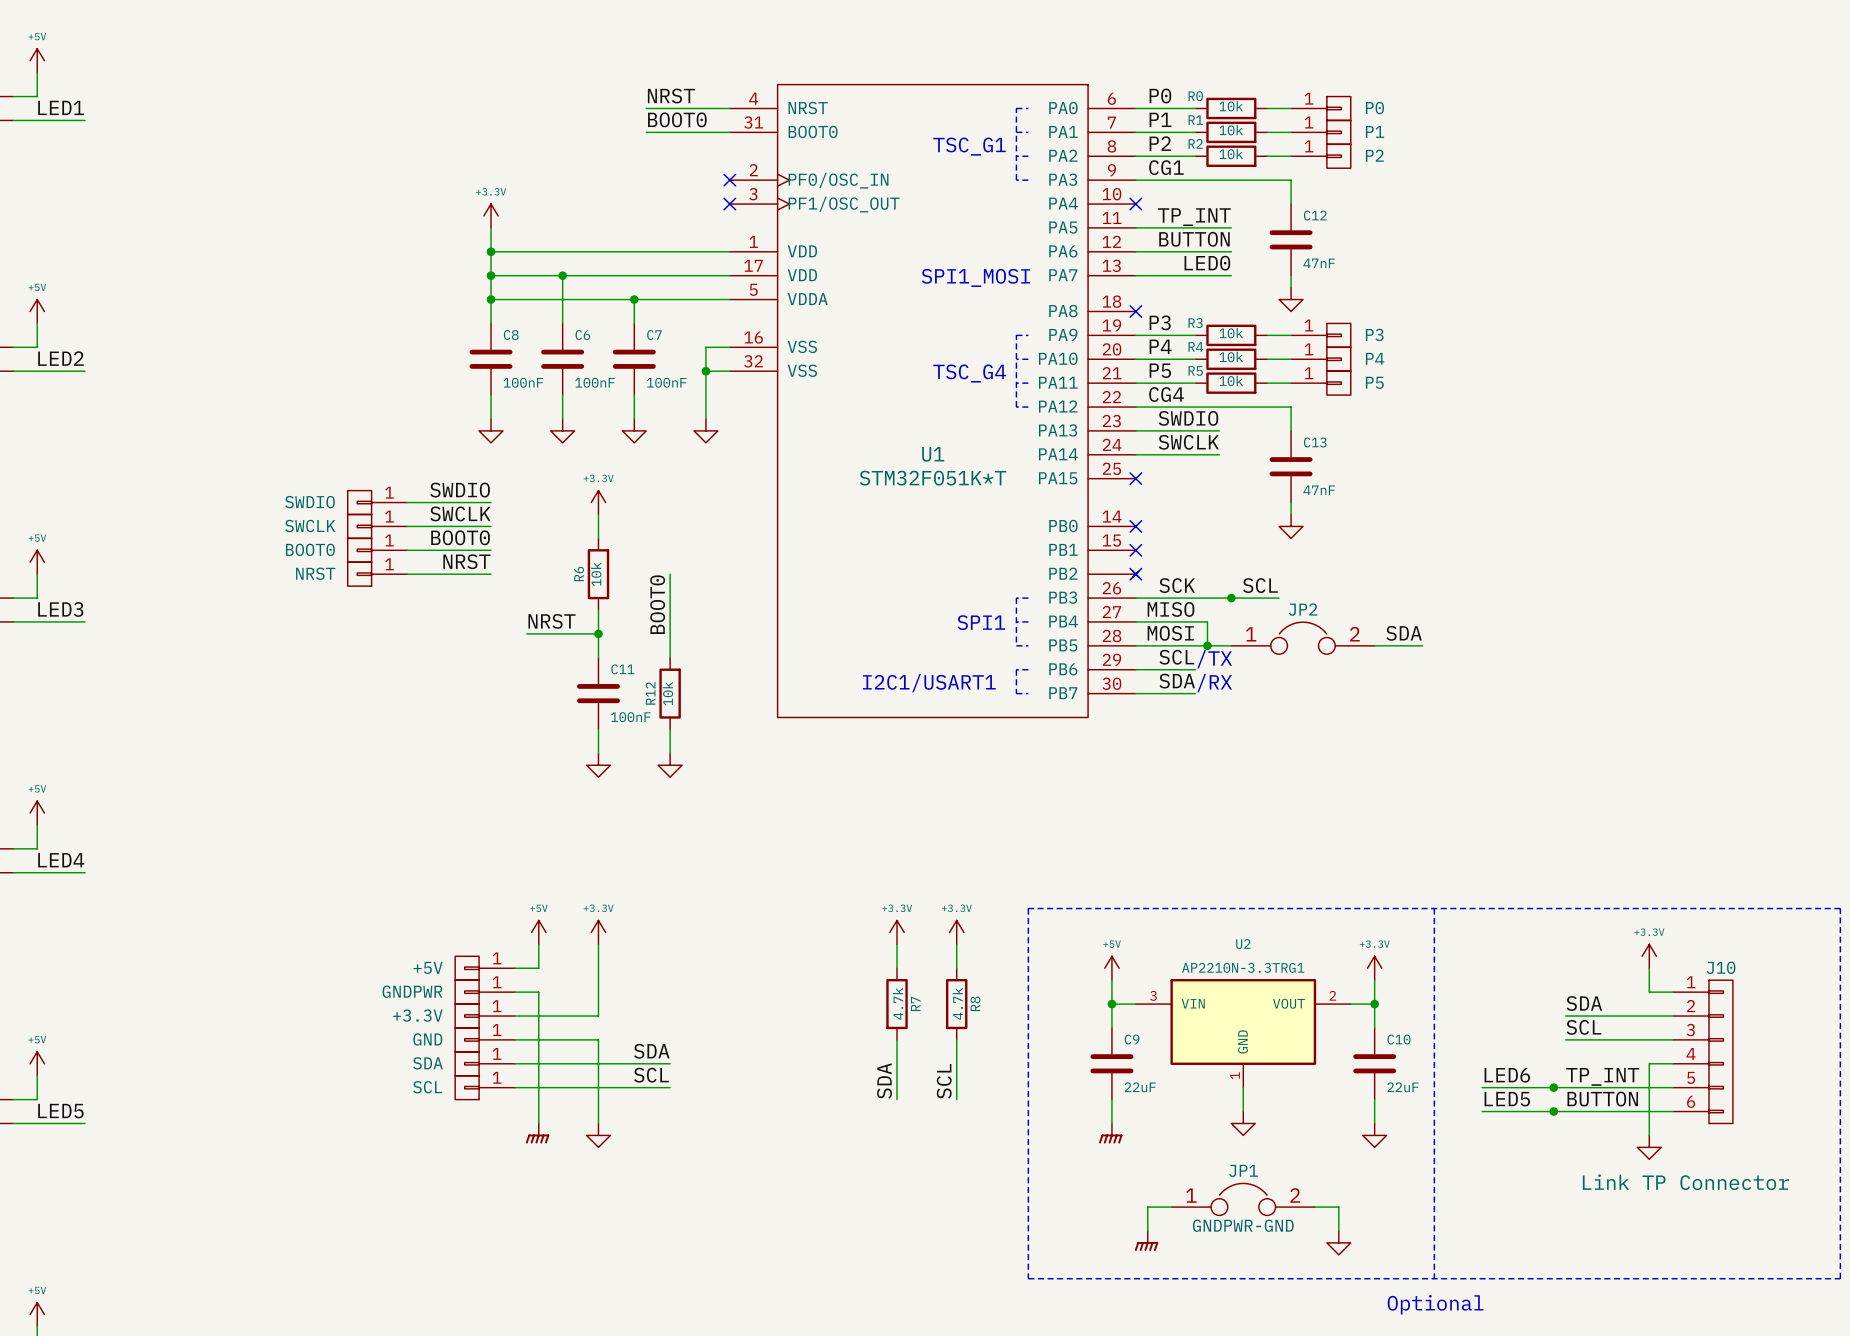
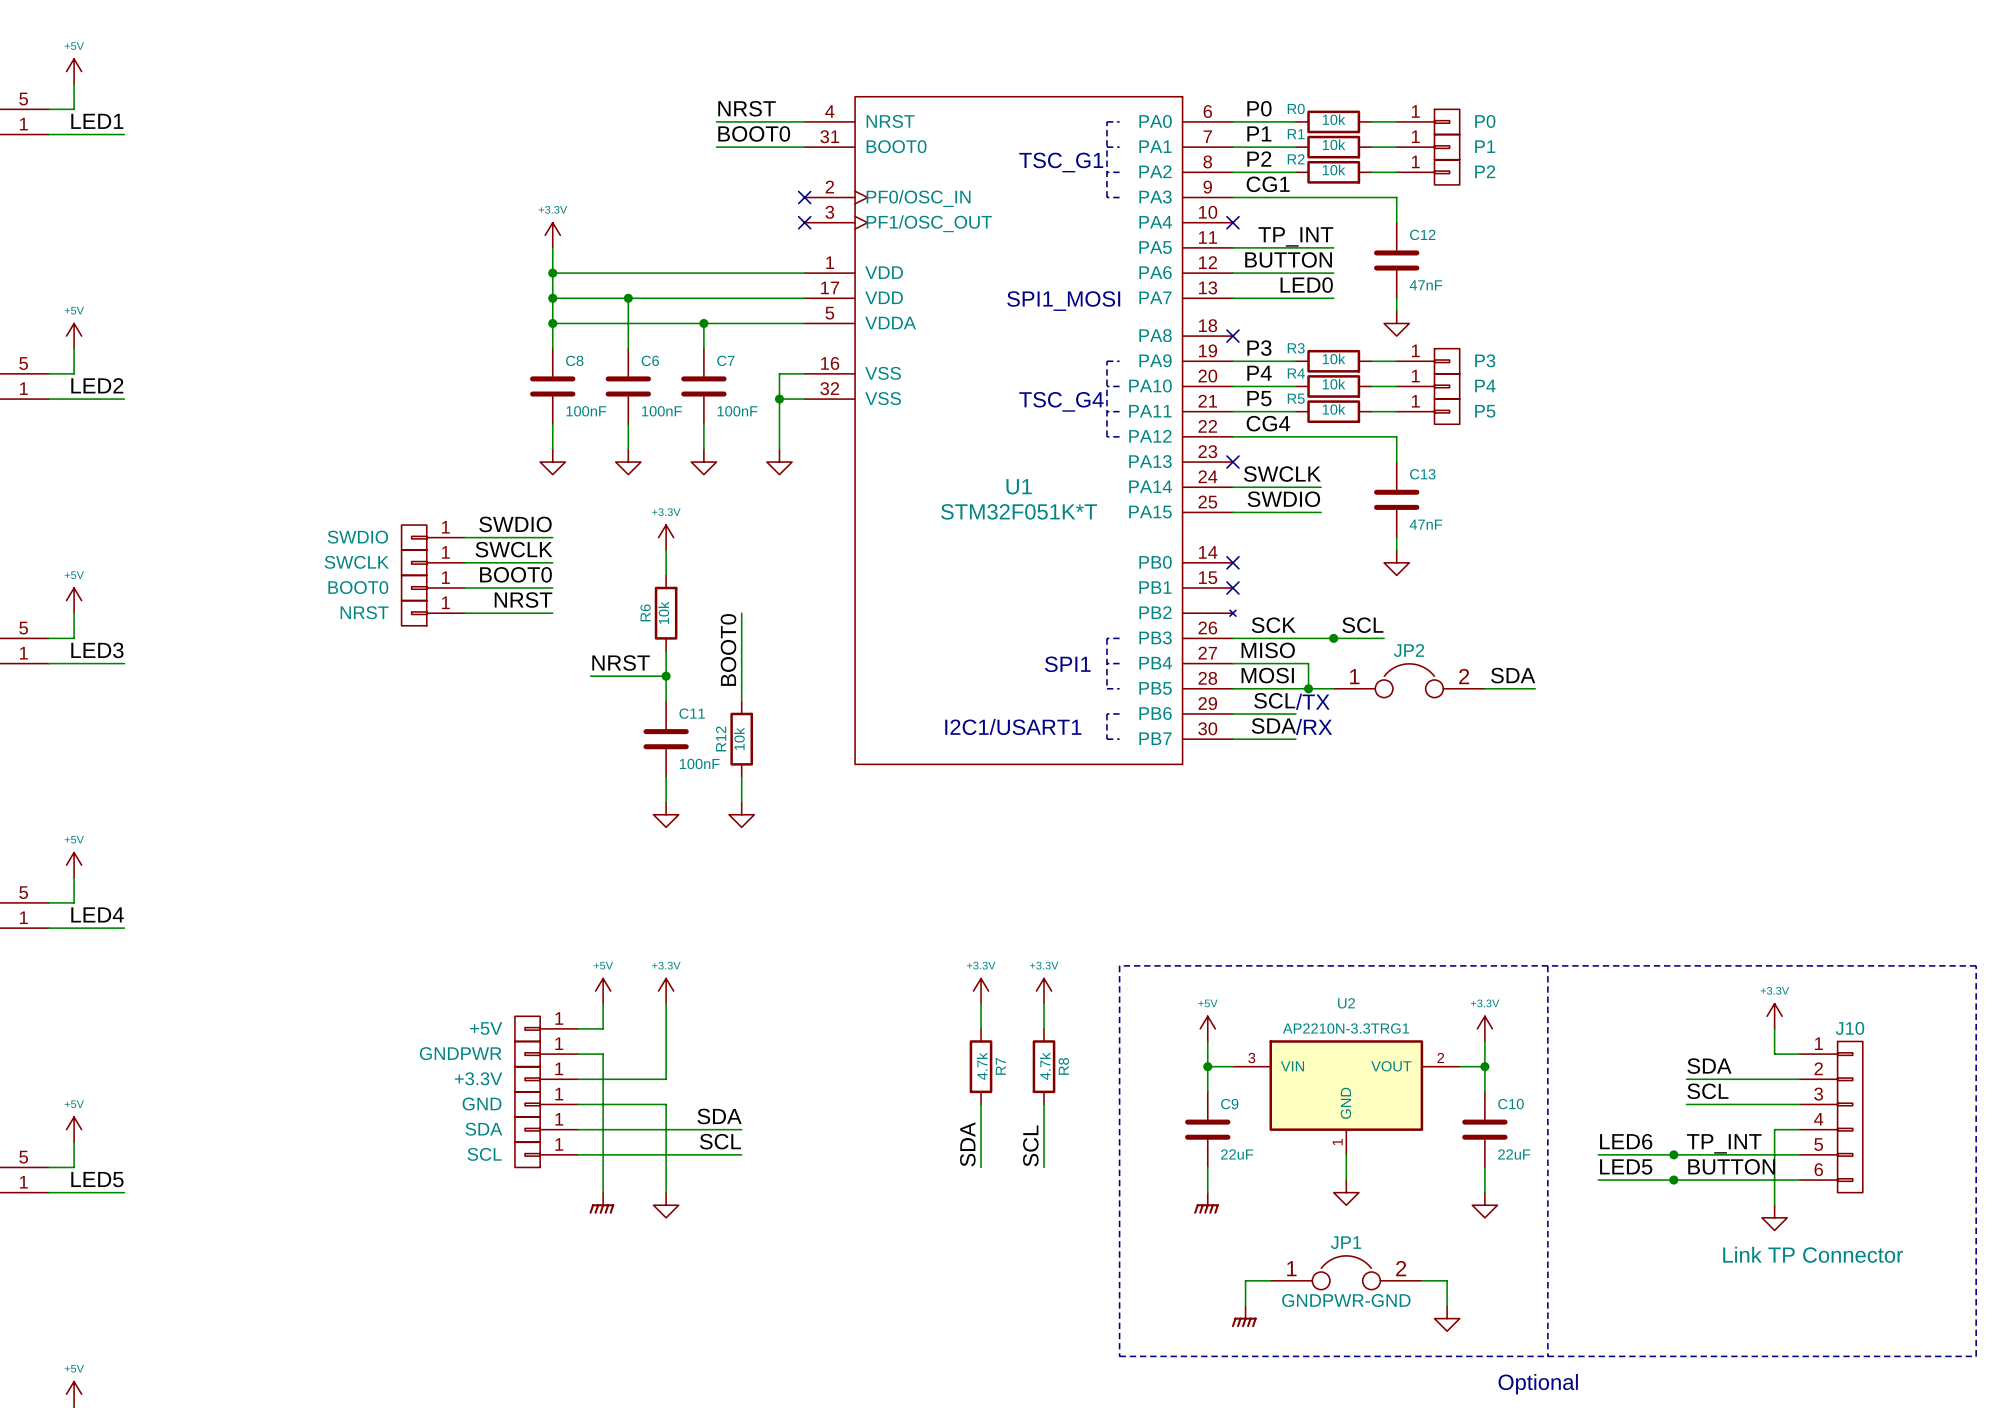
label position: SWDIO (1188, 418) -> SWDIO (1283, 499)
wire: (1135, 430) (1219, 430) -> (1232, 512) (1321, 512)
no-connect mark position: (1135, 478) -> (1232, 462)
no-connect mark: (1135, 574) -> none

